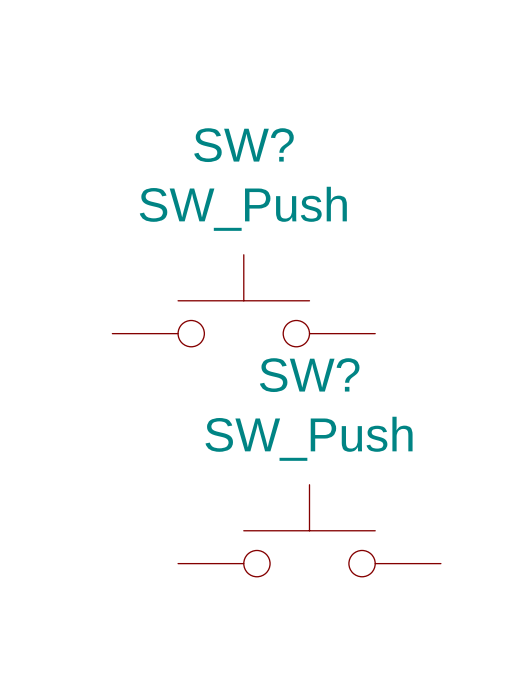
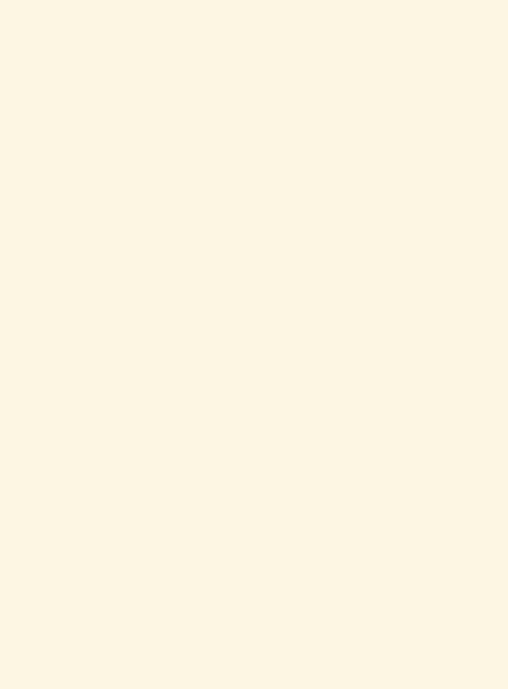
SW?: SW_Push (243, 300) -> none
SW?: SW_Push (309, 530) -> none

